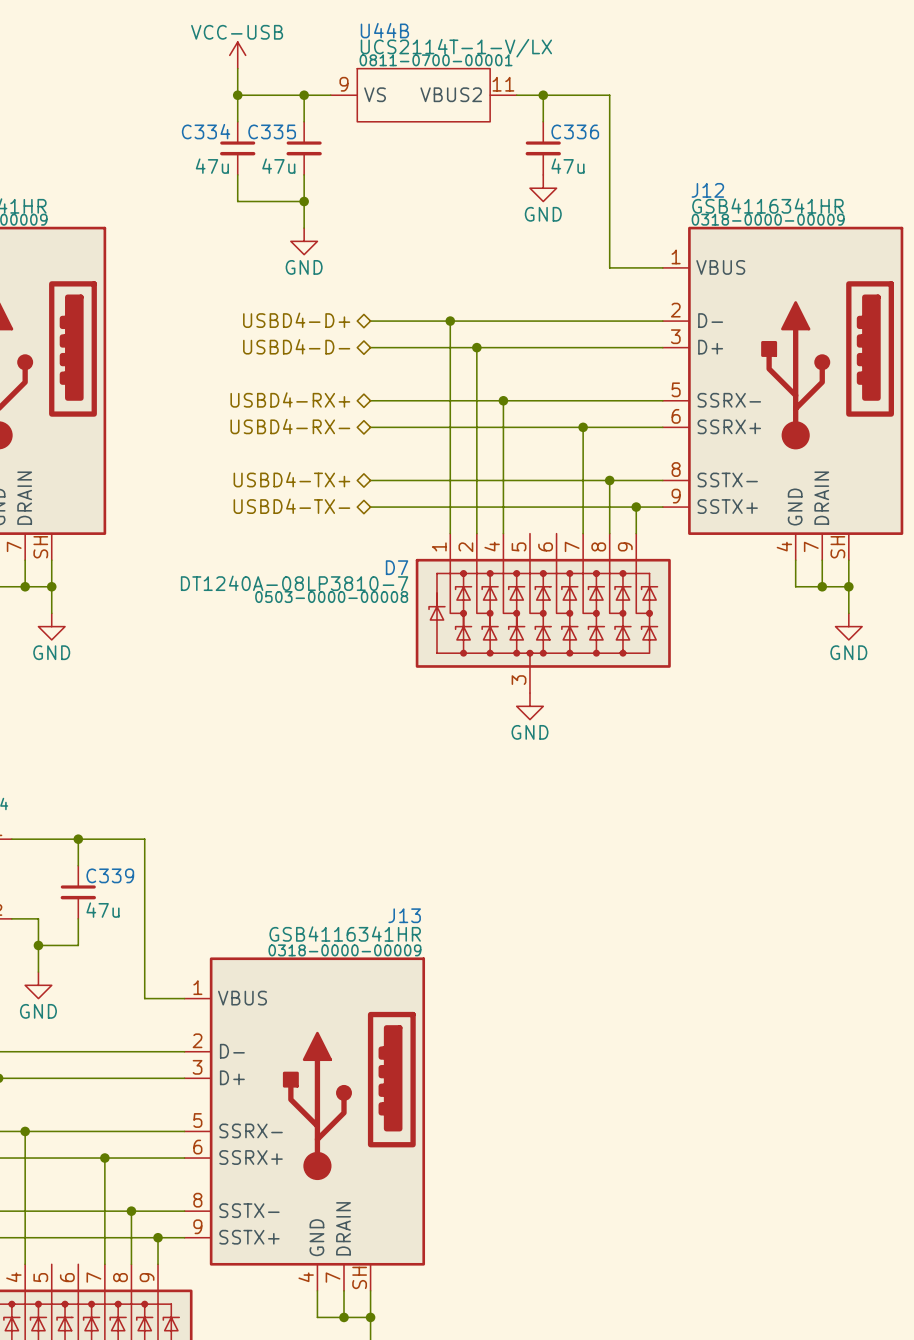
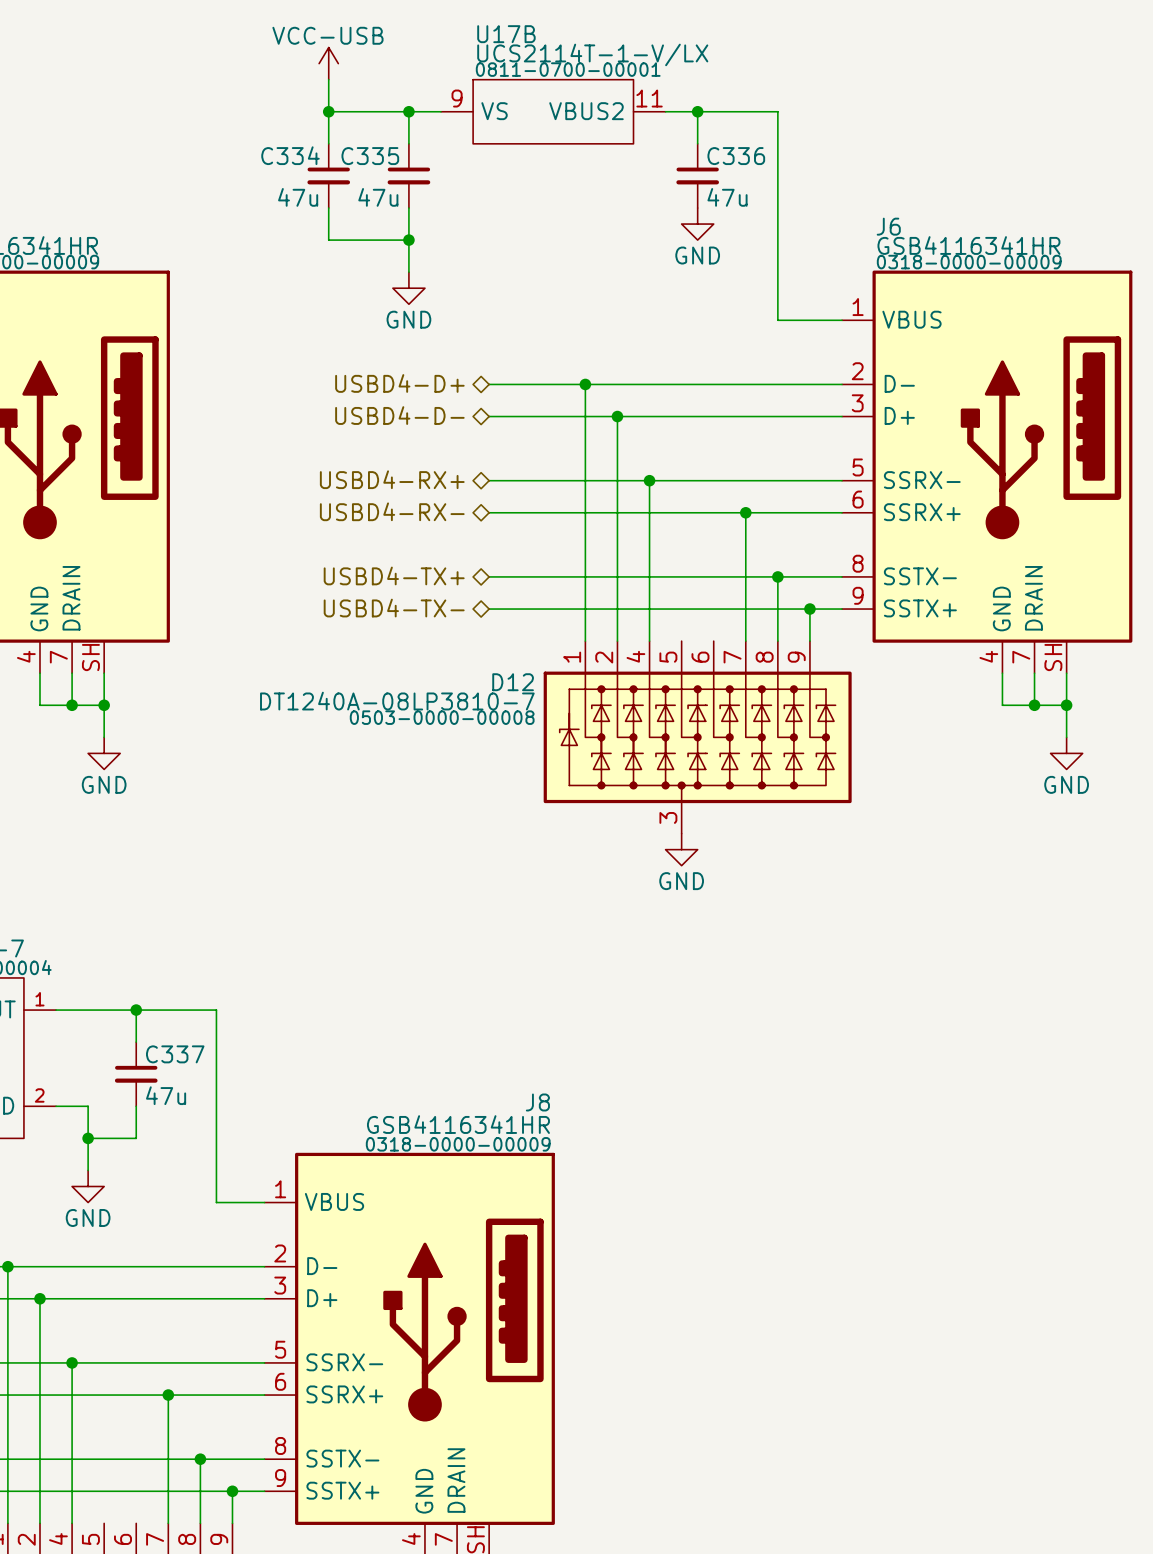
U44B name: U44B (384, 30) -> U17B (506, 34)
J12 name: J12 (707, 190) -> J6 (888, 226)
D7 name: D7 (397, 567) -> D12 (513, 682)
C339 name: C339 (110, 875) -> C337 (175, 1054)
J13 name: J13 (404, 915) -> J8 (537, 1102)

